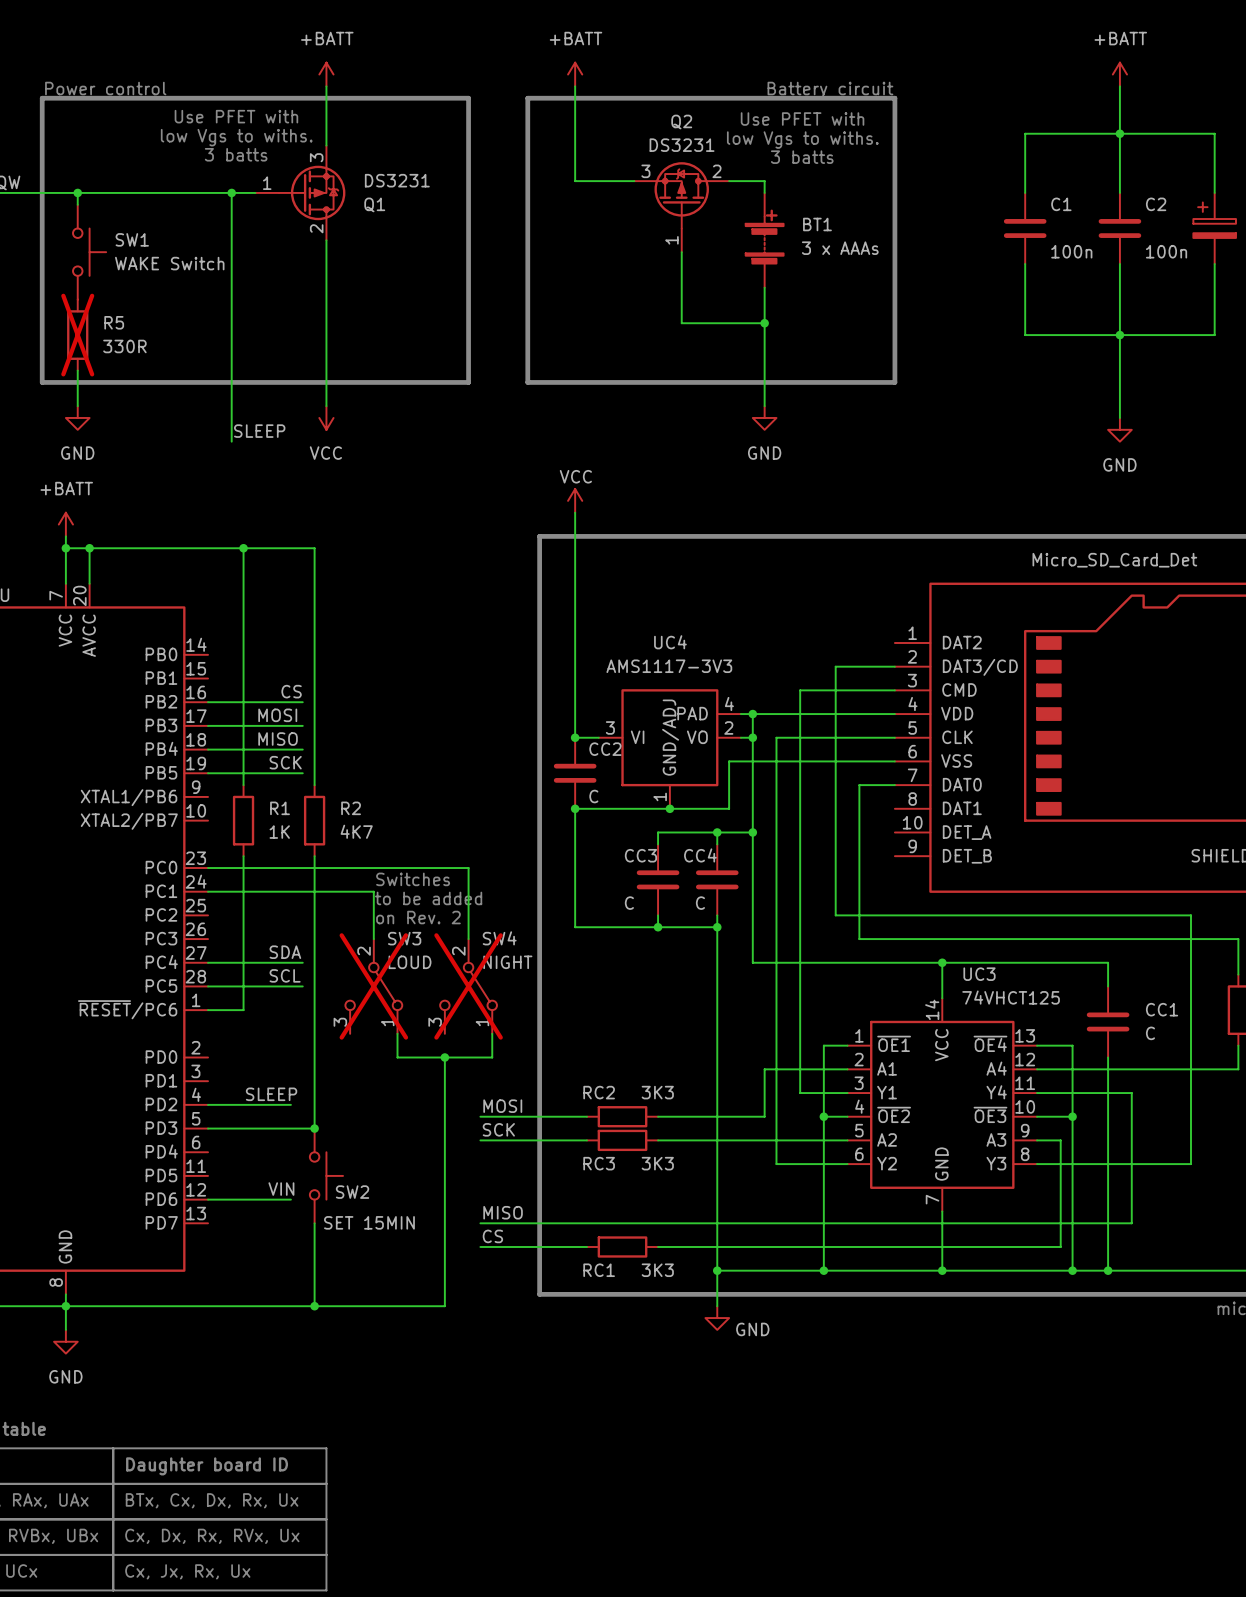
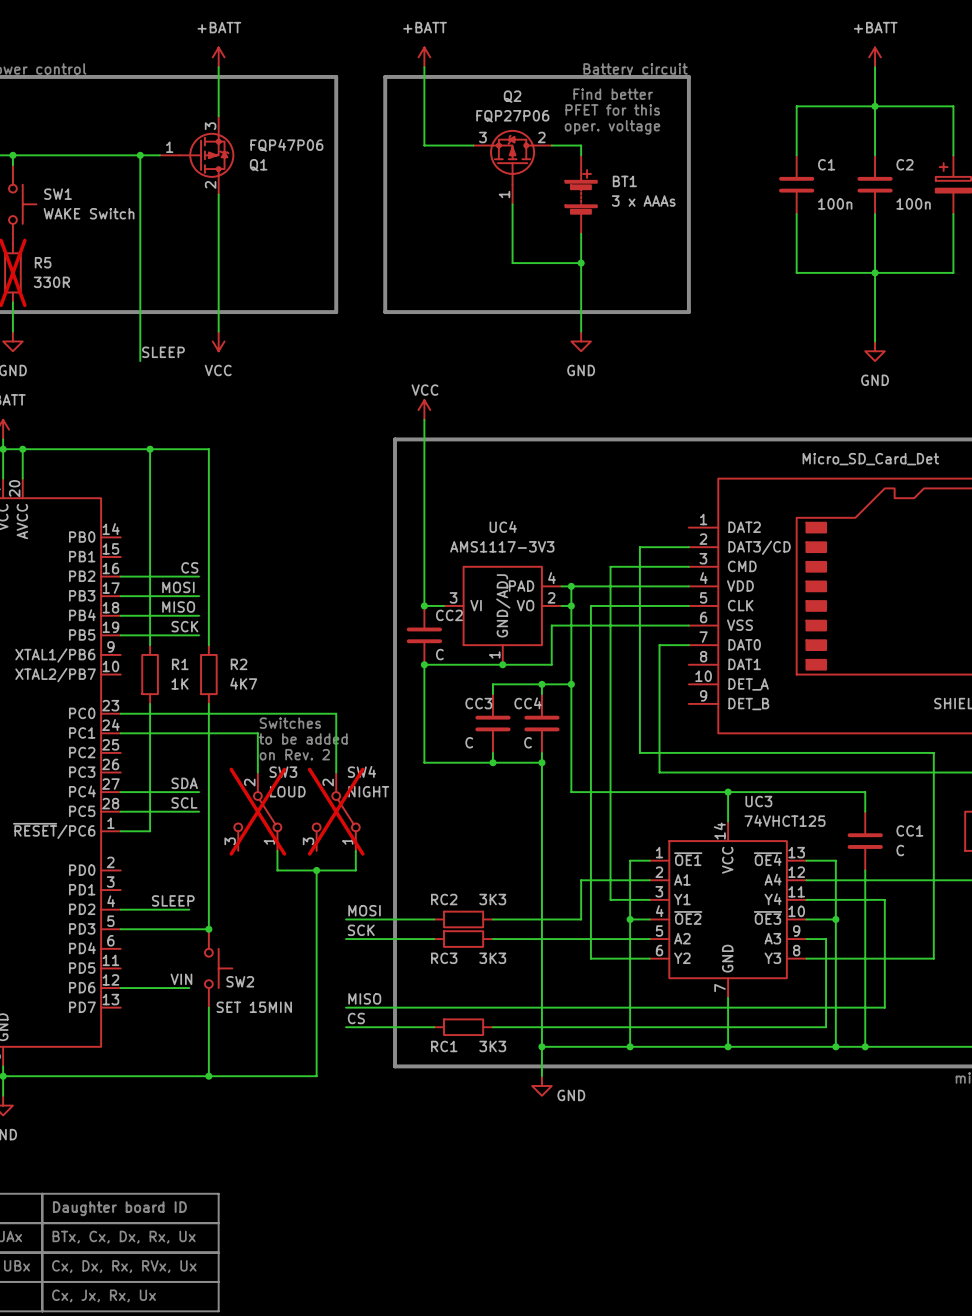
text: Use PFET with (236, 116) -> none
text: Use PFET with (802, 119) -> Find better (613, 94)
text: low Vgs to withs. (236, 137) -> none
text: low Vgs to withs. (802, 140) -> PFET for this (612, 109)
Q2 value: DS3231 (682, 145) -> FQP27P06 (512, 116)
text: 3 batts (236, 154) -> none
text: 3 batts (802, 157) -> oper. voltage (612, 127)
Q1 value: DS3231 (397, 180) -> FQP47P06 (286, 145)

